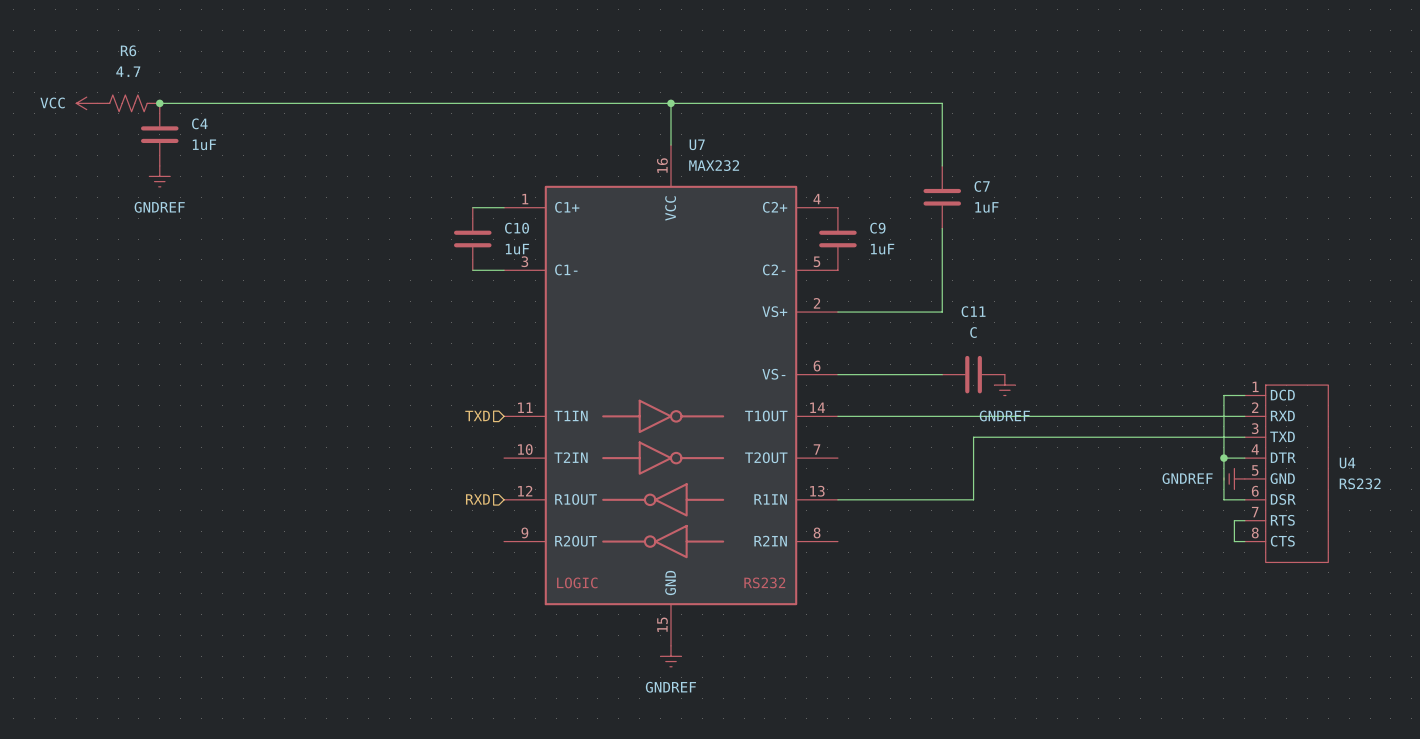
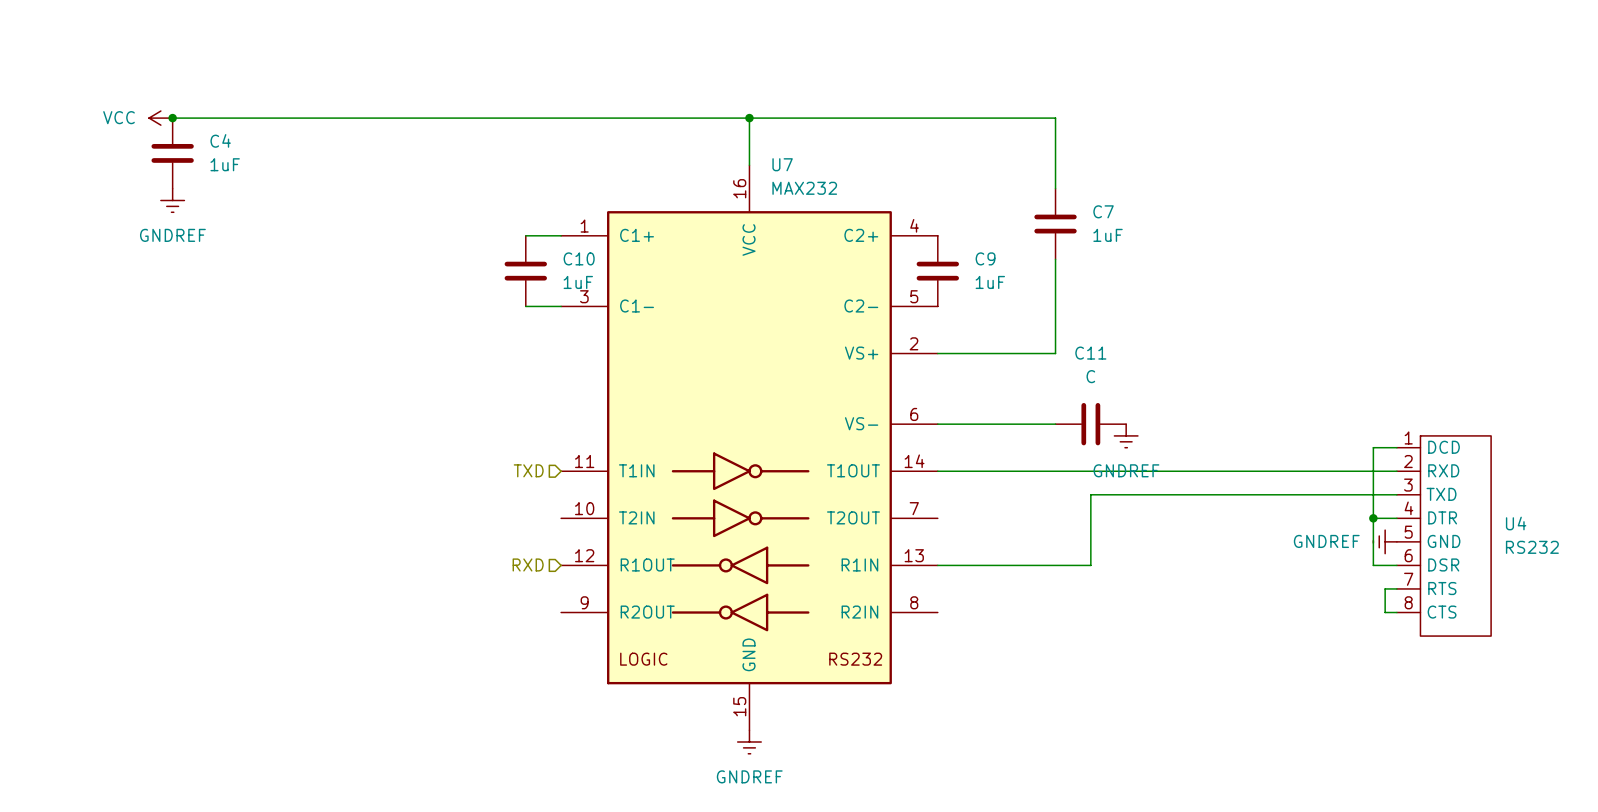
power symbol position: VCC (86, 103) -> VCC (160, 118)
R6: 4.7 (128, 103) -> none

